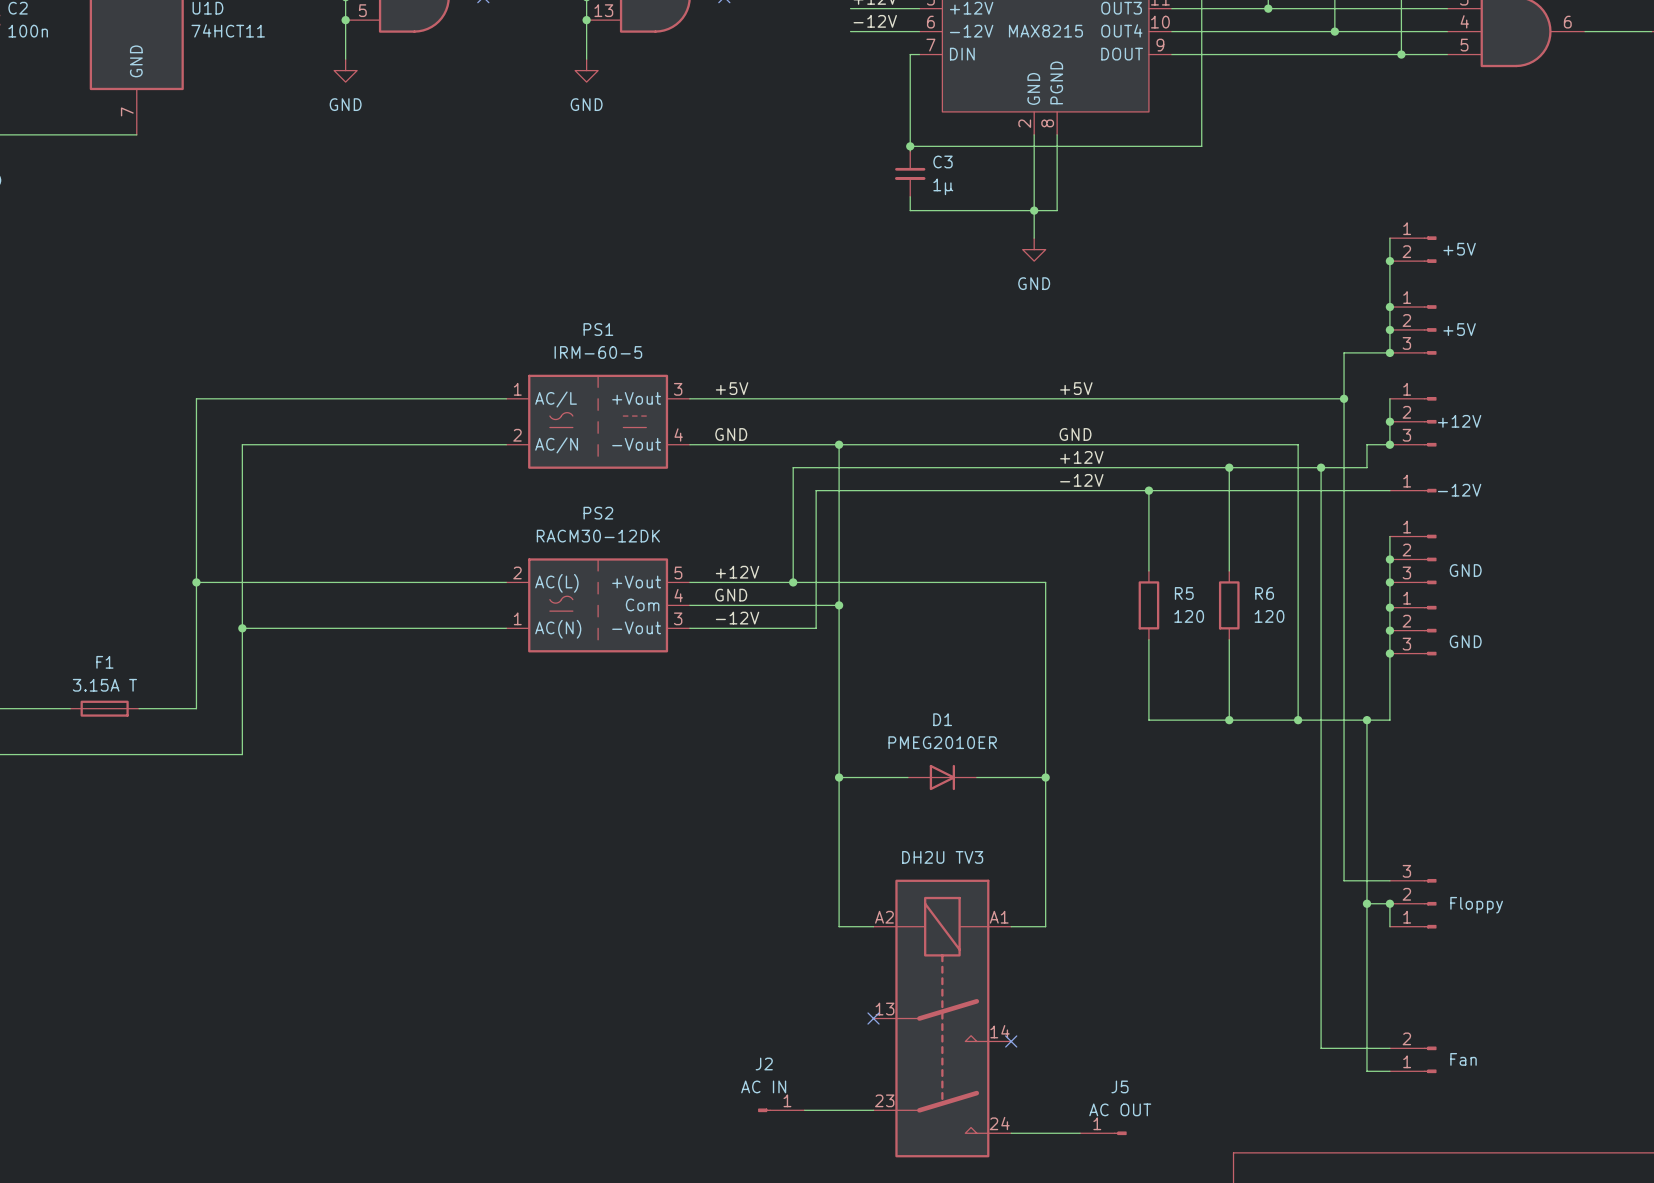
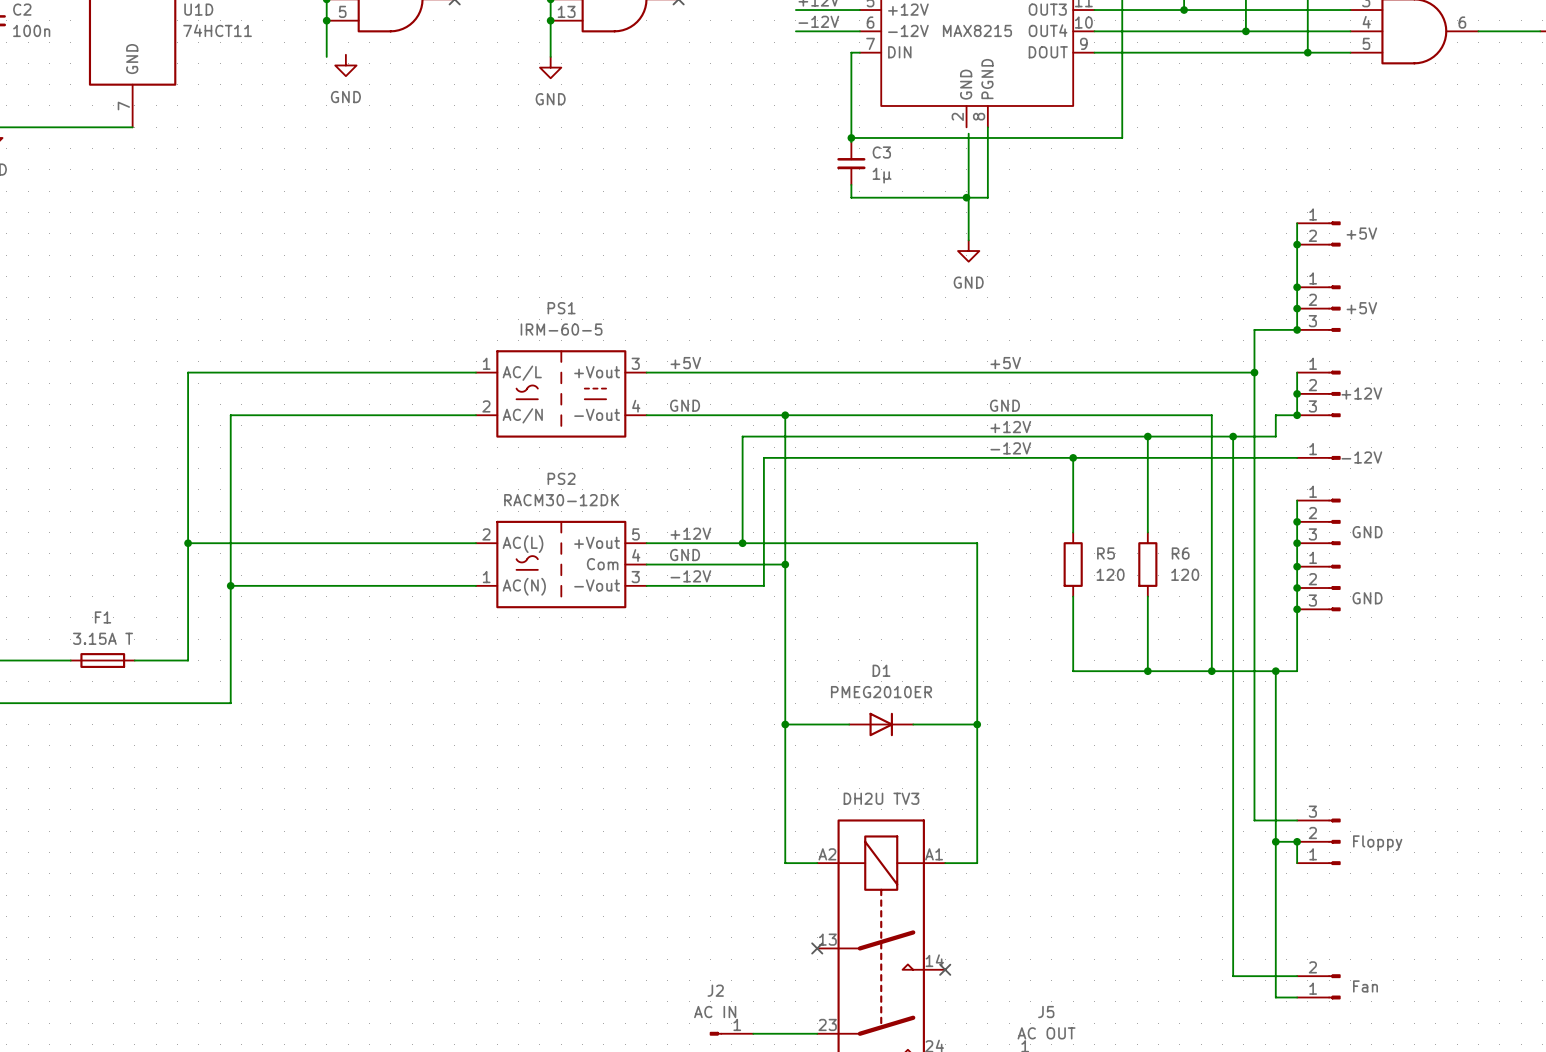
power symbol position: GND (345, 70) -> GND (345, 65)
wire: (1034, 134) (1034, 238) -> none
wire: none -> (968, 133) (968, 240)
power symbol position: GND (1034, 249) -> GND (968, 251)

